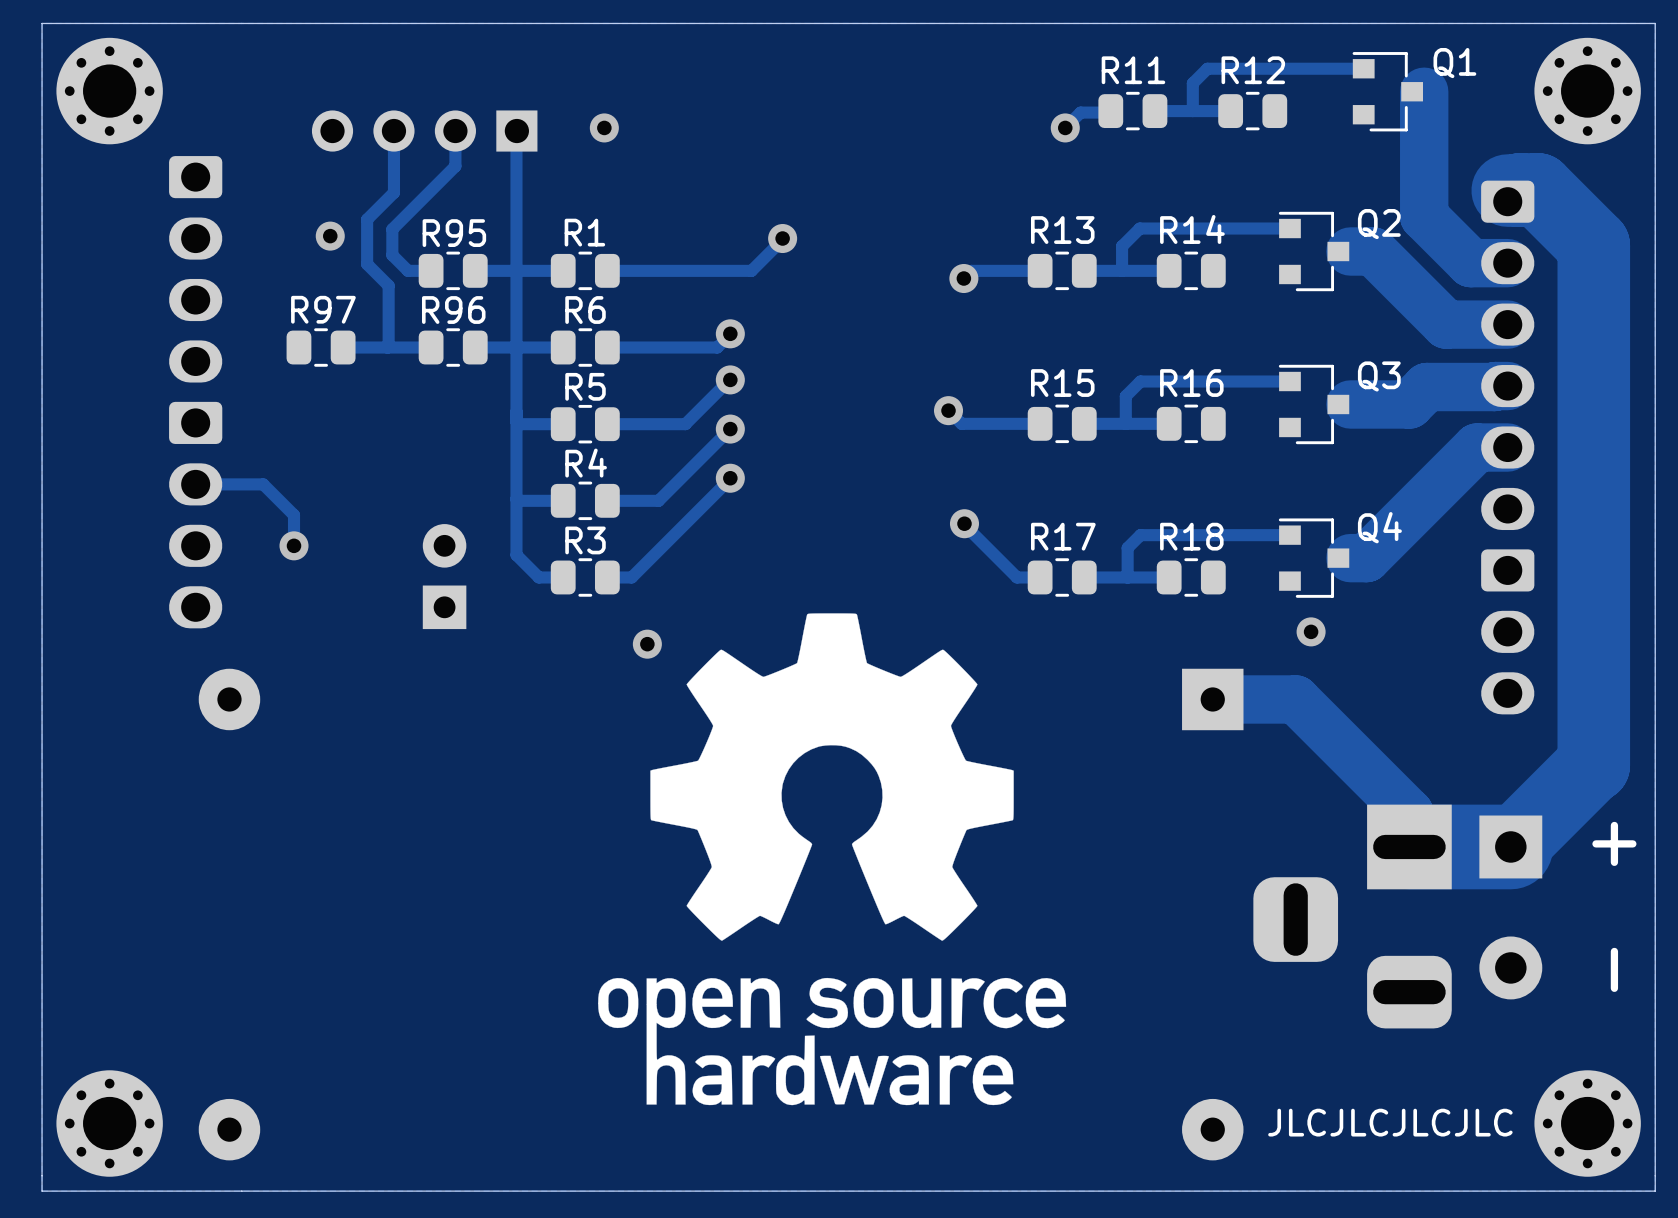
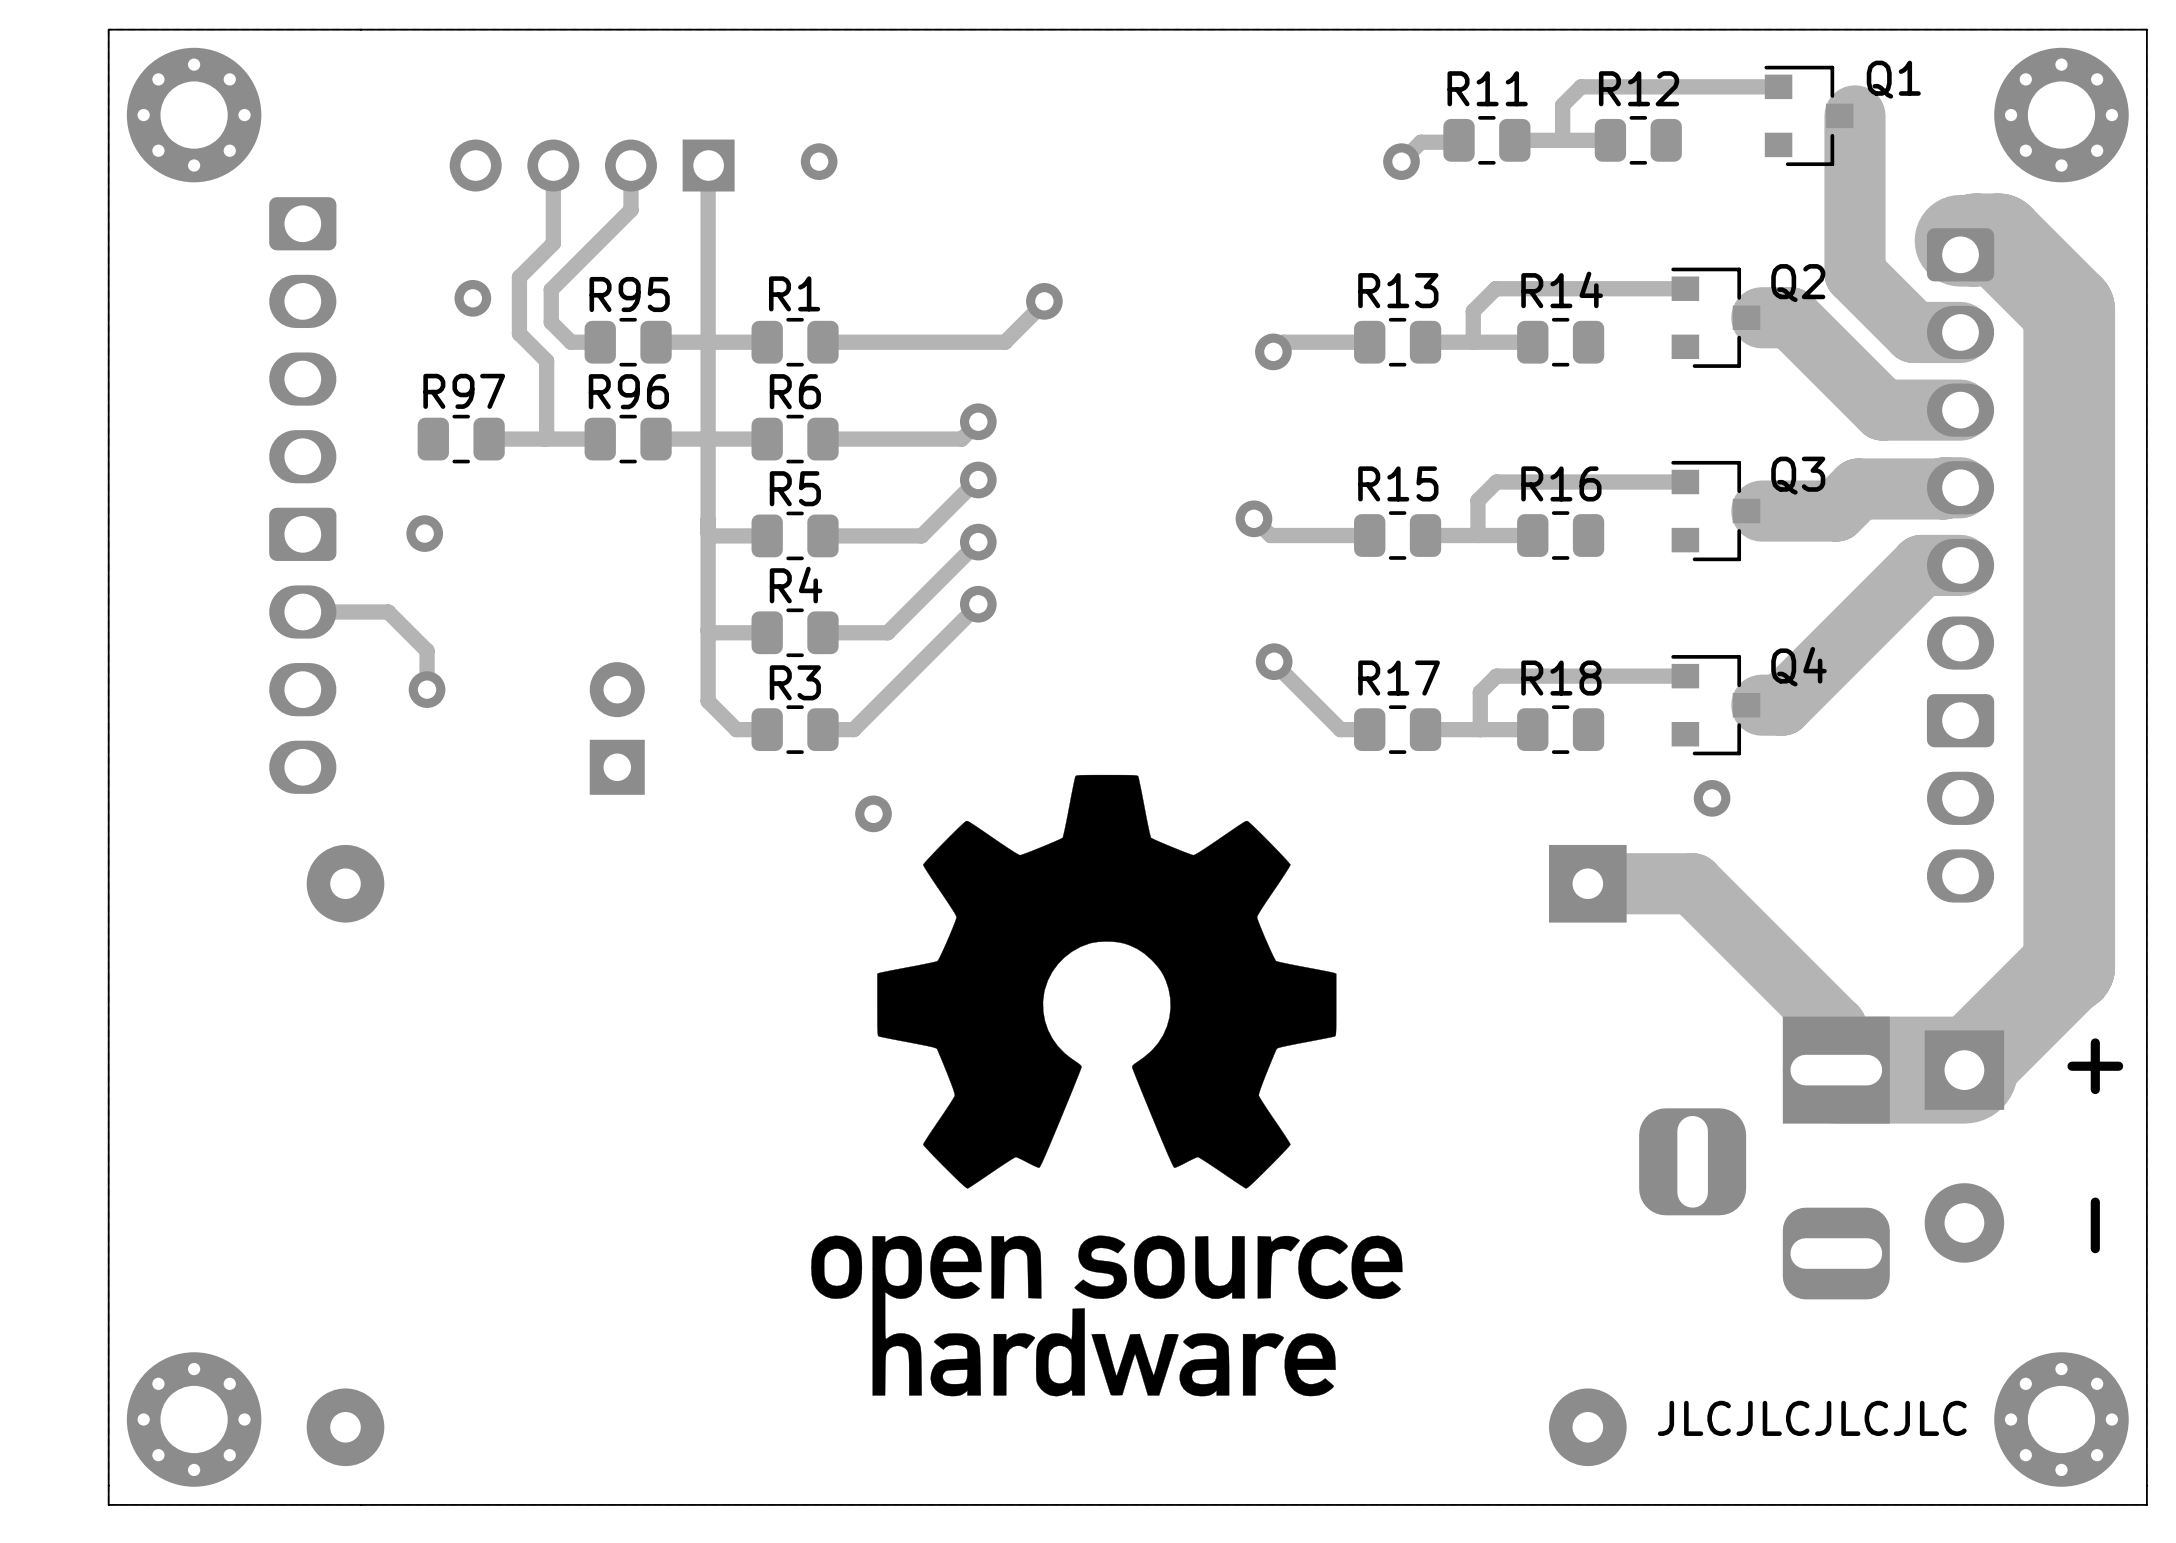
via: none -> (424, 533)

